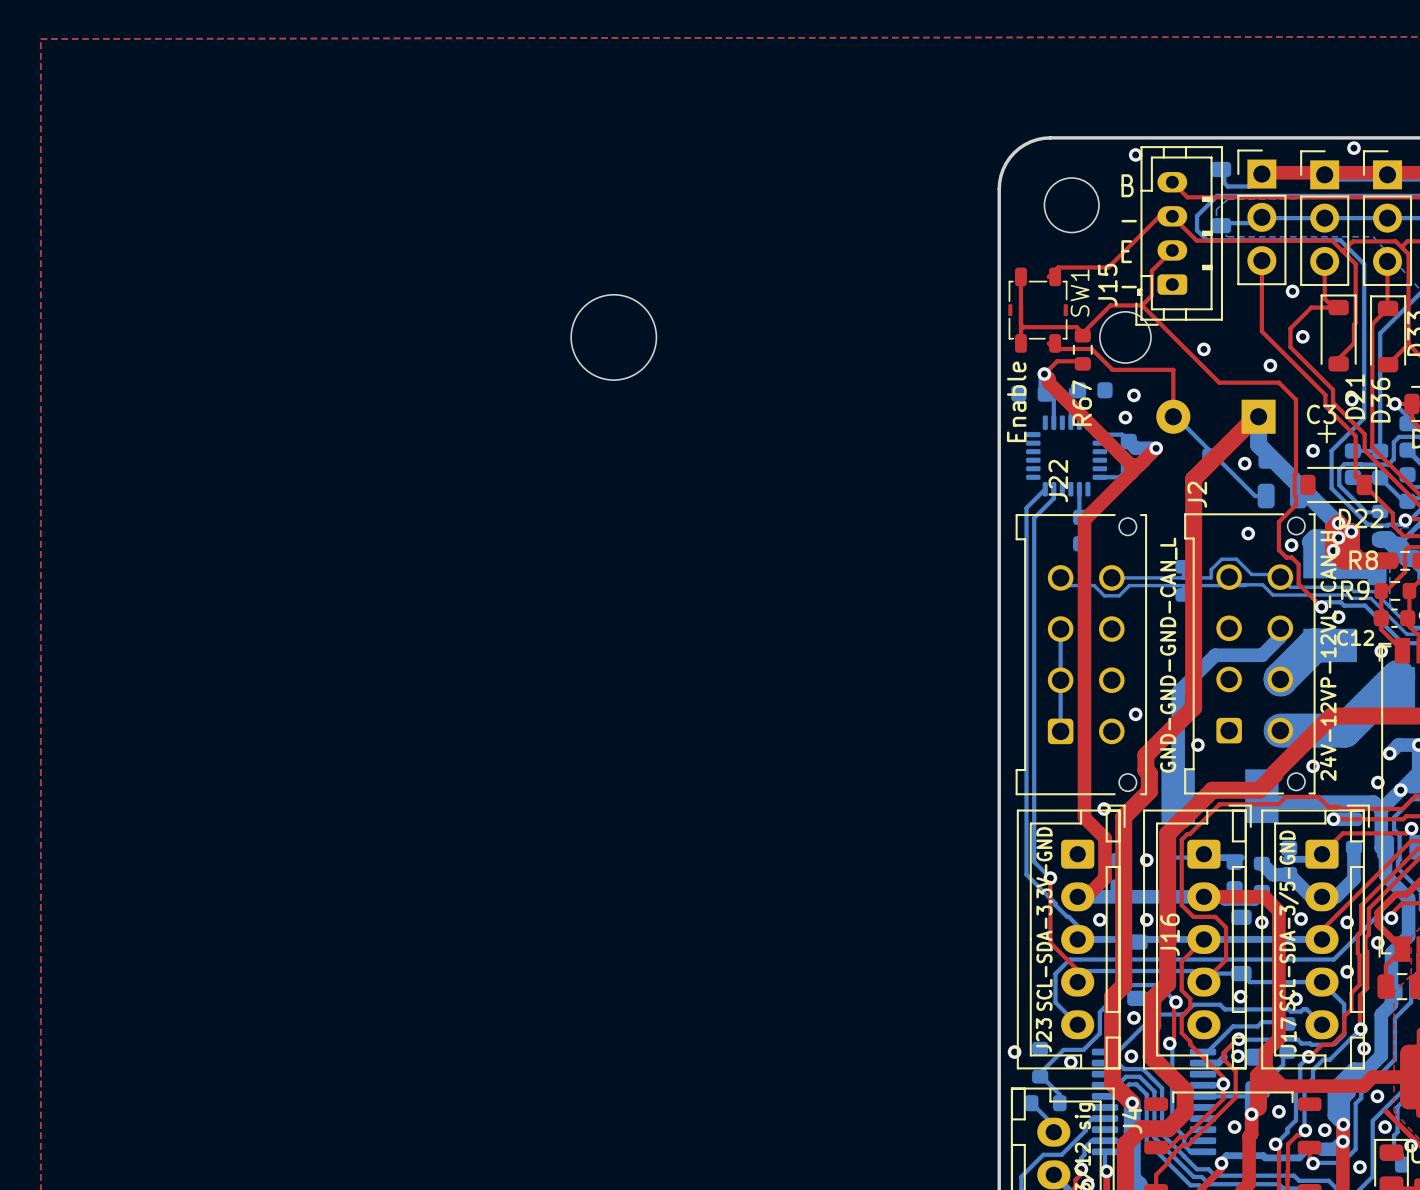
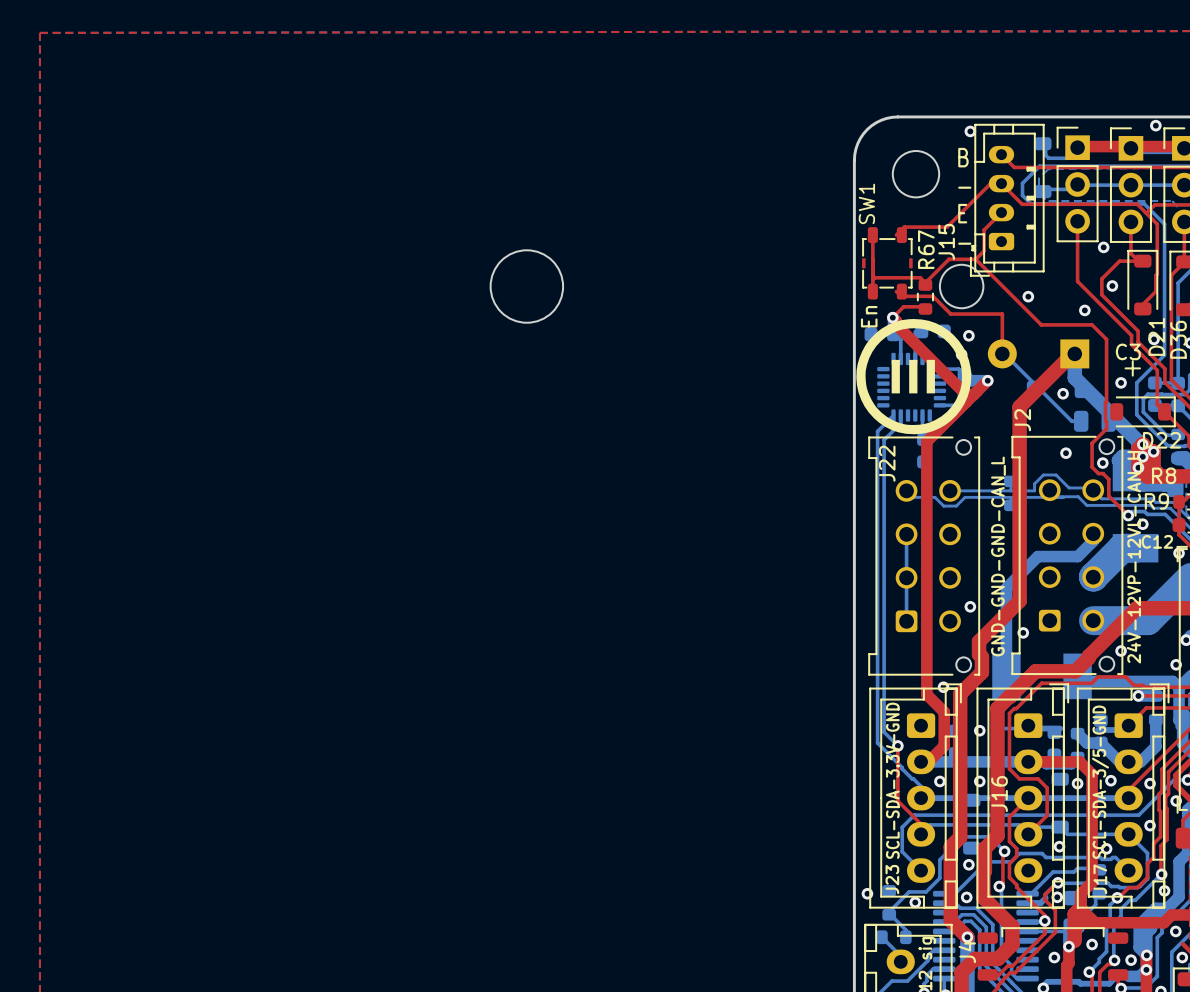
SW1 name position: SW1 (1080, 293) -> SW1 (866, 203)
text: none -> En (869, 316)
drawing: none -> [856, 319, 972, 435]
text: Enable (1016, 401) -> none
R67 name position: R67 (1082, 403) -> R67 (926, 249)
J22 name position: J22 (1058, 481) -> J22 (887, 463)

